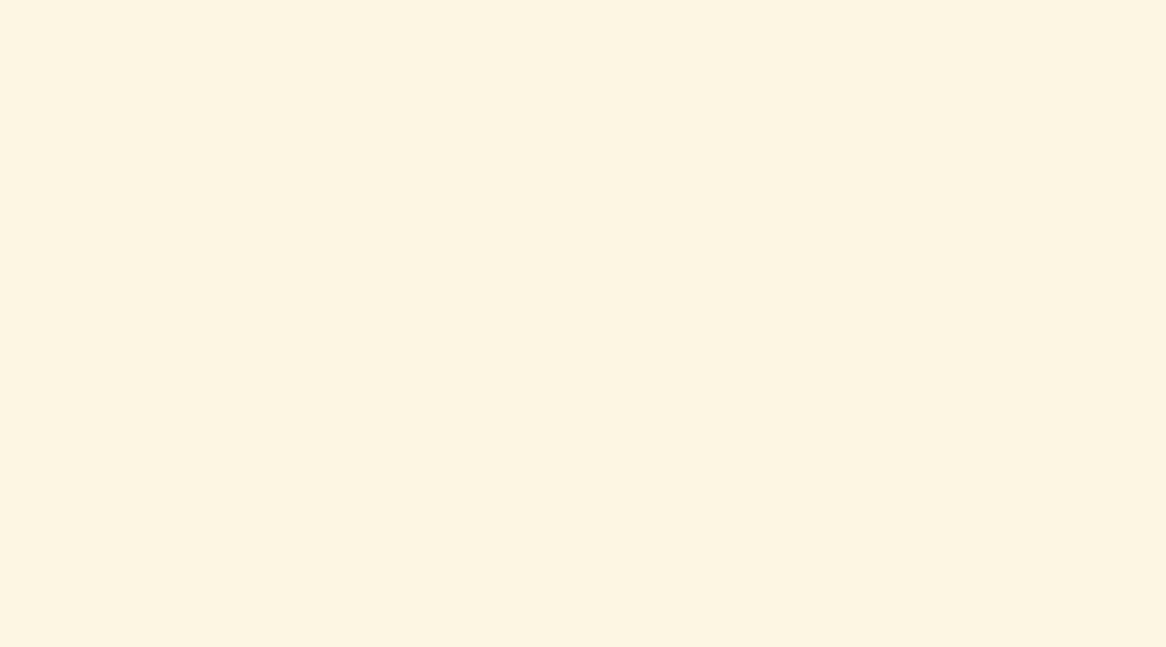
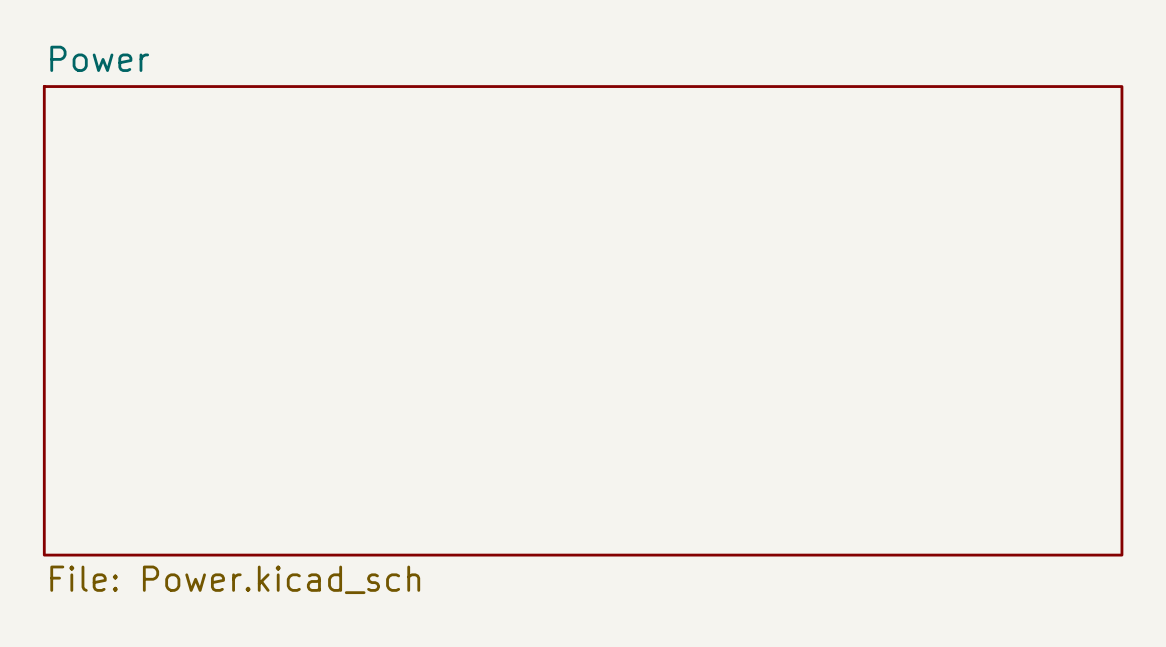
sheet Power: none -> File: Power.kicad_sch (583, 320)

